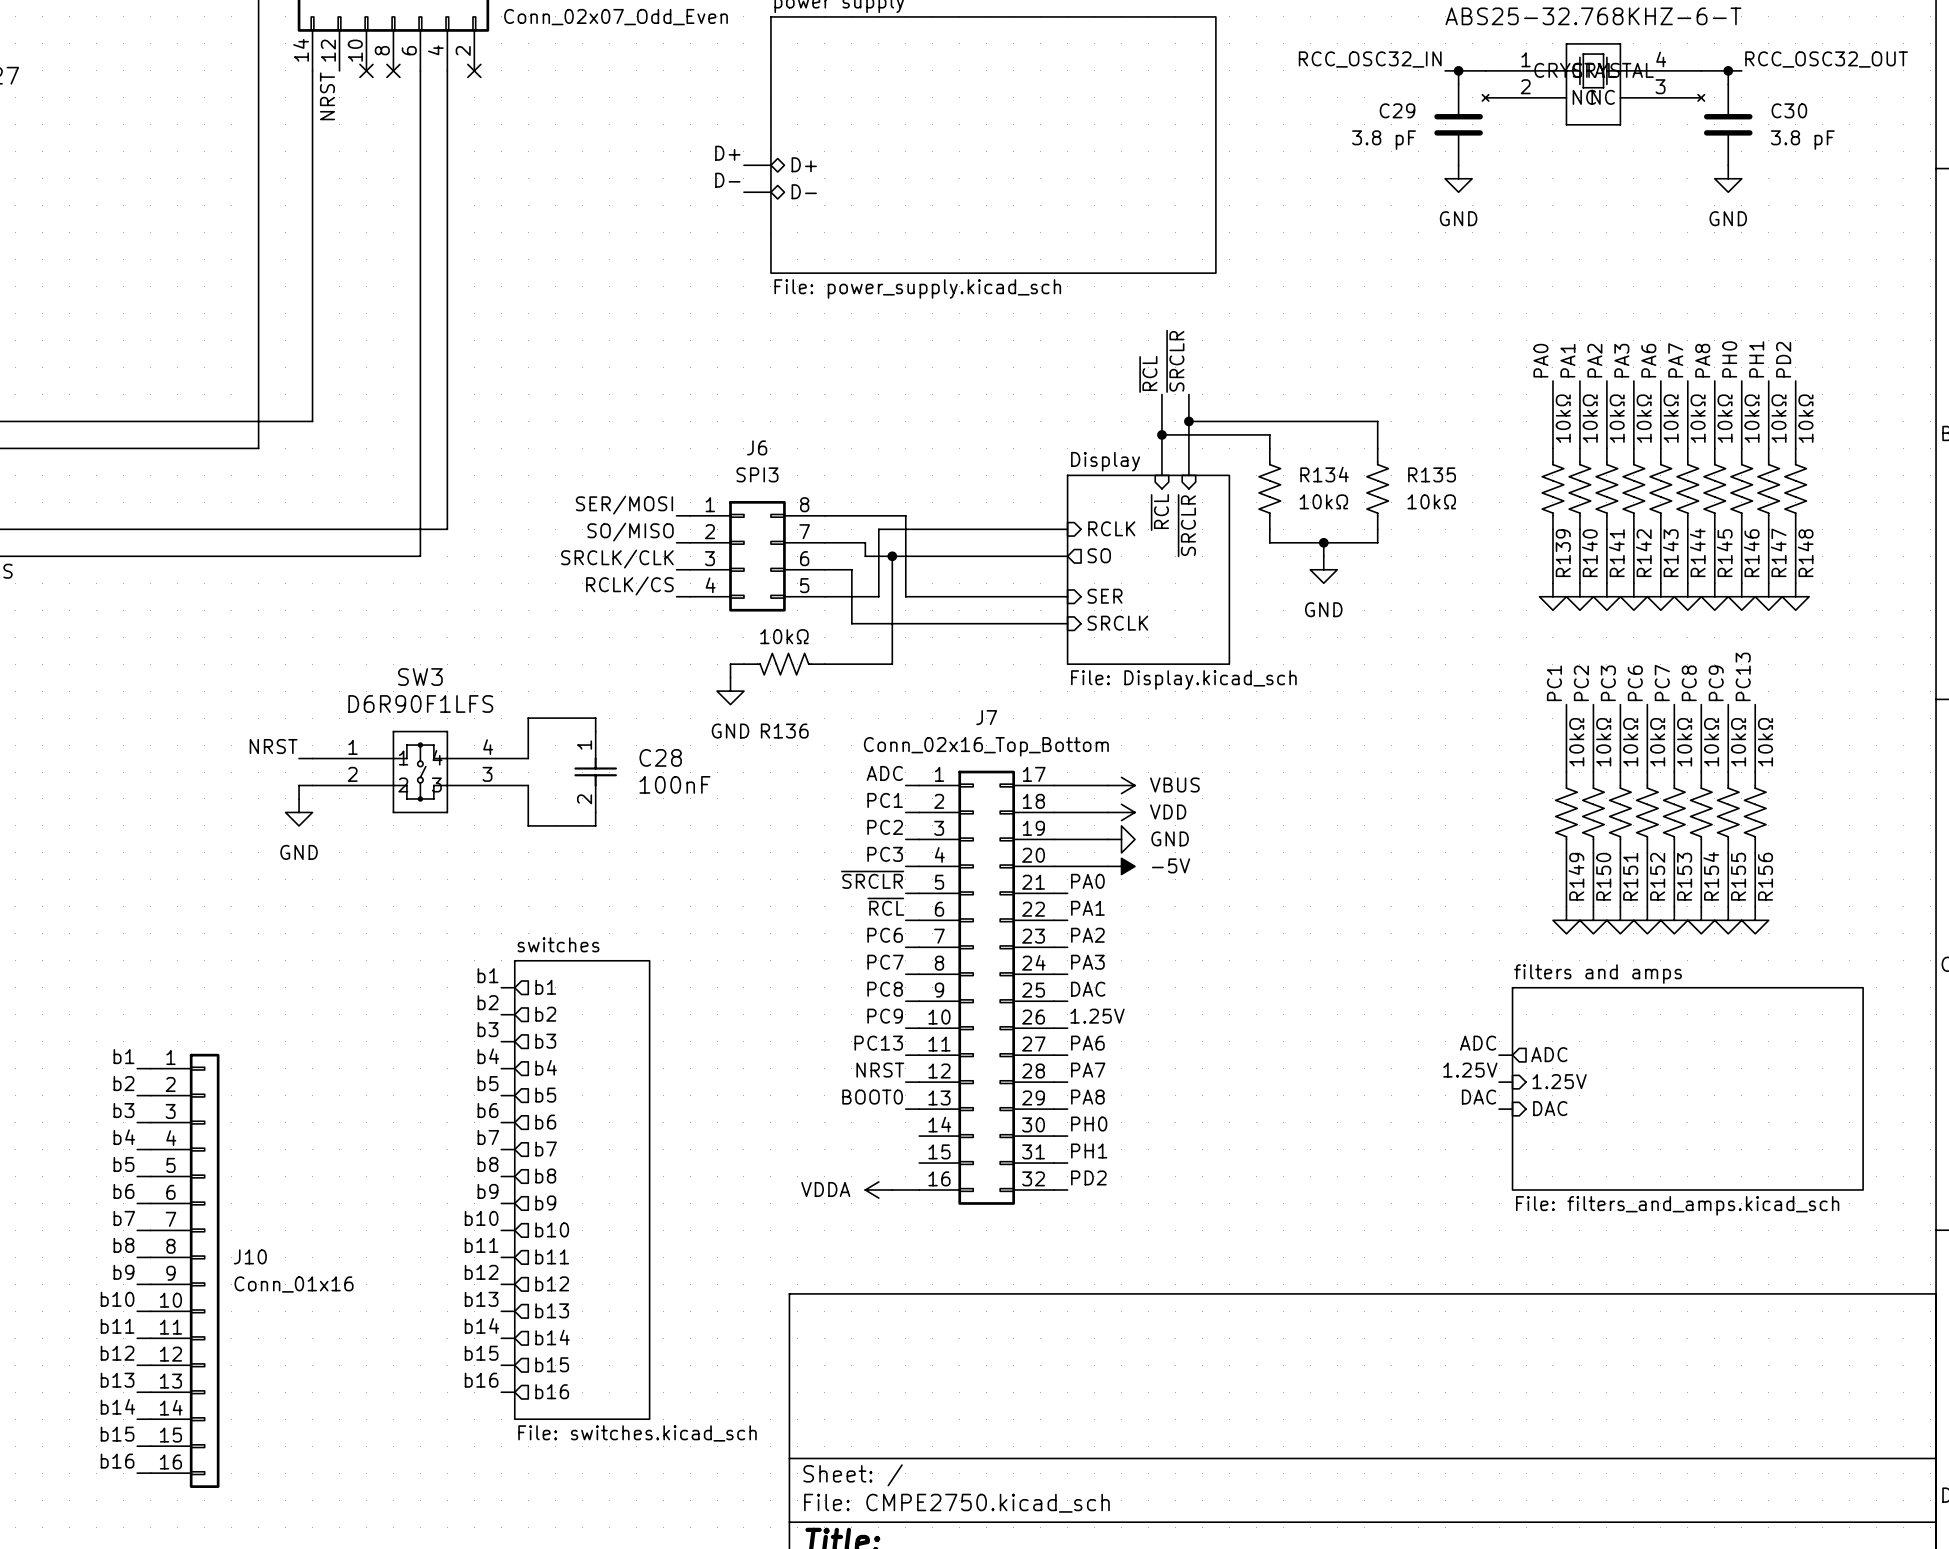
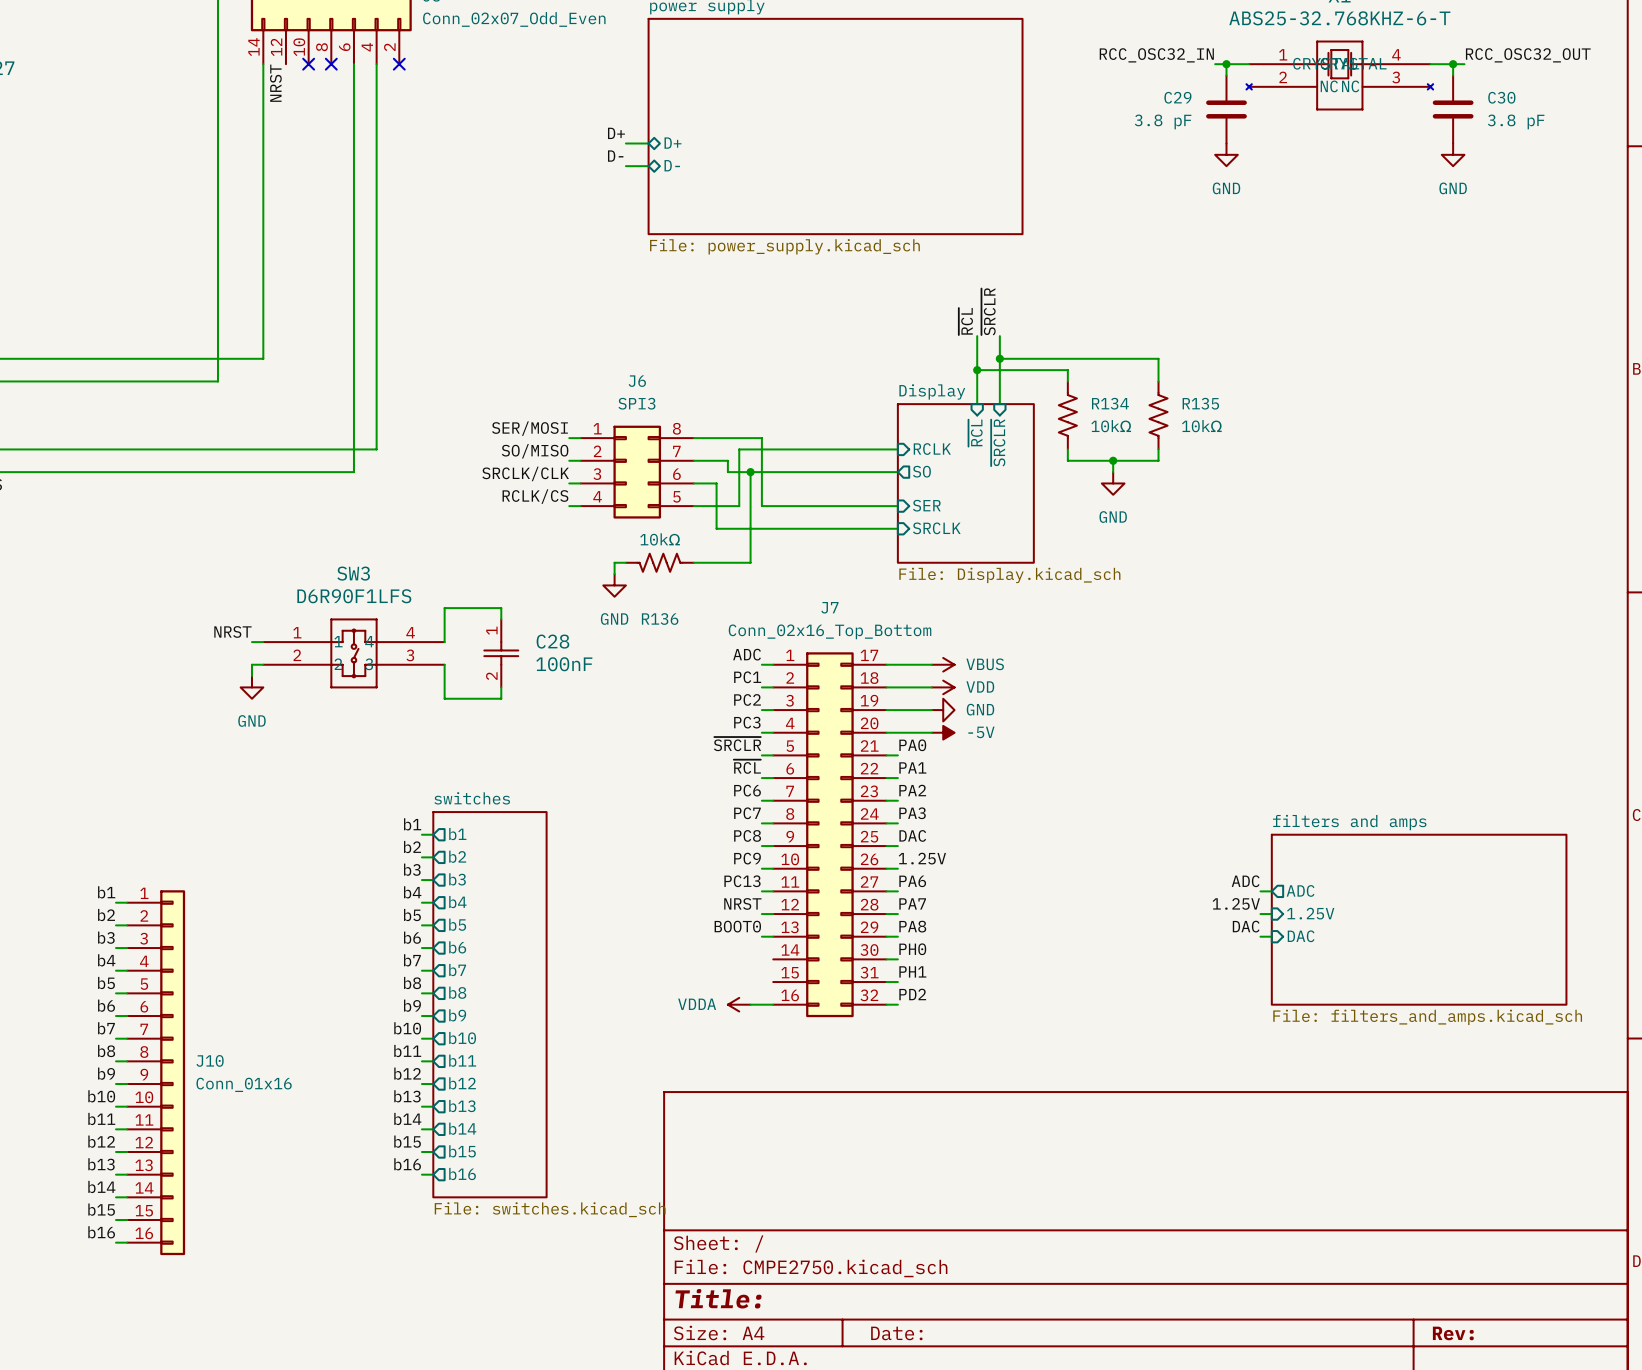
label: PH0 (1729, 359) -> none
label: PH1 (1756, 359) -> none
label: PD2 (1783, 359) -> none
label: PA0 (1540, 360) -> none
label: PA1 (1567, 360) -> none
label: PA2 (1594, 360) -> none
label: PA3 (1621, 360) -> none
label: PA6 (1648, 360) -> none
label: PA7 (1675, 360) -> none
label: PA8 (1702, 360) -> none
wire: (1552, 381) (1552, 448) -> none
wire: (1579, 381) (1579, 448) -> none
wire: (1606, 381) (1606, 448) -> none
wire: (1633, 381) (1633, 448) -> none
wire: (1660, 381) (1660, 448) -> none
wire: (1687, 381) (1687, 448) -> none
wire: (1714, 381) (1714, 448) -> none
wire: (1741, 381) (1741, 448) -> none
wire: (1768, 381) (1768, 448) -> none
wire: (1795, 381) (1795, 448) -> none
R139: 10kΩ (1552, 488) -> none
R140: 10kΩ (1579, 488) -> none
R141: 10kΩ (1606, 488) -> none
R142: 10kΩ (1633, 488) -> none
R143: 10kΩ (1660, 488) -> none
R144: 10kΩ (1687, 488) -> none
R145: 10kΩ (1714, 488) -> none
R146: 10kΩ (1741, 488) -> none
R147: 10kΩ (1768, 488) -> none
R148: 10kΩ (1795, 488) -> none
wire: (1552, 529) (1552, 583) -> none
wire: (1579, 529) (1579, 583) -> none
wire: (1606, 529) (1606, 583) -> none
wire: (1633, 529) (1633, 583) -> none
wire: (1660, 529) (1660, 583) -> none
wire: (1687, 529) (1687, 583) -> none
wire: (1714, 529) (1714, 583) -> none
wire: (1741, 529) (1741, 583) -> none
wire: (1768, 529) (1768, 583) -> none
wire: (1795, 529) (1795, 583) -> none
power symbol: (1552, 596) -> none
power symbol: (1579, 596) -> none
power symbol: (1606, 596) -> none
power symbol: (1633, 596) -> none
power symbol: (1660, 596) -> none
power symbol: (1687, 596) -> none
power symbol: (1714, 596) -> none
power symbol: (1741, 596) -> none
power symbol: (1768, 596) -> none
power symbol: (1795, 596) -> none
label: PC13 (1743, 676) -> none
label: PC7 (1662, 682) -> none
label: PC1 (1554, 683) -> none
label: PC2 (1581, 683) -> none
label: PC3 (1608, 683) -> none
label: PC6 (1635, 683) -> none
label: PC8 (1689, 683) -> none
label: PC9 (1716, 683) -> none
wire: (1566, 704) (1566, 772) -> none
wire: (1593, 704) (1593, 772) -> none
wire: (1620, 704) (1620, 772) -> none
wire: (1647, 704) (1647, 772) -> none
wire: (1674, 704) (1674, 772) -> none
wire: (1701, 704) (1701, 772) -> none
wire: (1728, 704) (1728, 772) -> none
wire: (1755, 704) (1755, 772) -> none
R149: 10kΩ (1566, 812) -> none
R150: 10kΩ (1593, 812) -> none
R151: 10kΩ (1620, 812) -> none
R152: 10kΩ (1647, 812) -> none
R153: 10kΩ (1674, 812) -> none
R154: 10kΩ (1701, 812) -> none
R155: 10kΩ (1728, 812) -> none
R156: 10kΩ (1755, 812) -> none
wire: (1566, 852) (1566, 906) -> none
wire: (1593, 852) (1593, 906) -> none
wire: (1620, 852) (1620, 906) -> none
wire: (1647, 852) (1647, 906) -> none
wire: (1674, 852) (1674, 906) -> none
wire: (1701, 852) (1701, 906) -> none
wire: (1728, 852) (1728, 906) -> none
wire: (1755, 852) (1755, 906) -> none
power symbol: (1566, 920) -> none
power symbol: (1593, 920) -> none
power symbol: (1620, 920) -> none
power symbol: (1647, 920) -> none
power symbol: (1674, 920) -> none
power symbol: (1701, 920) -> none
power symbol: (1728, 920) -> none
power symbol: (1755, 920) -> none

